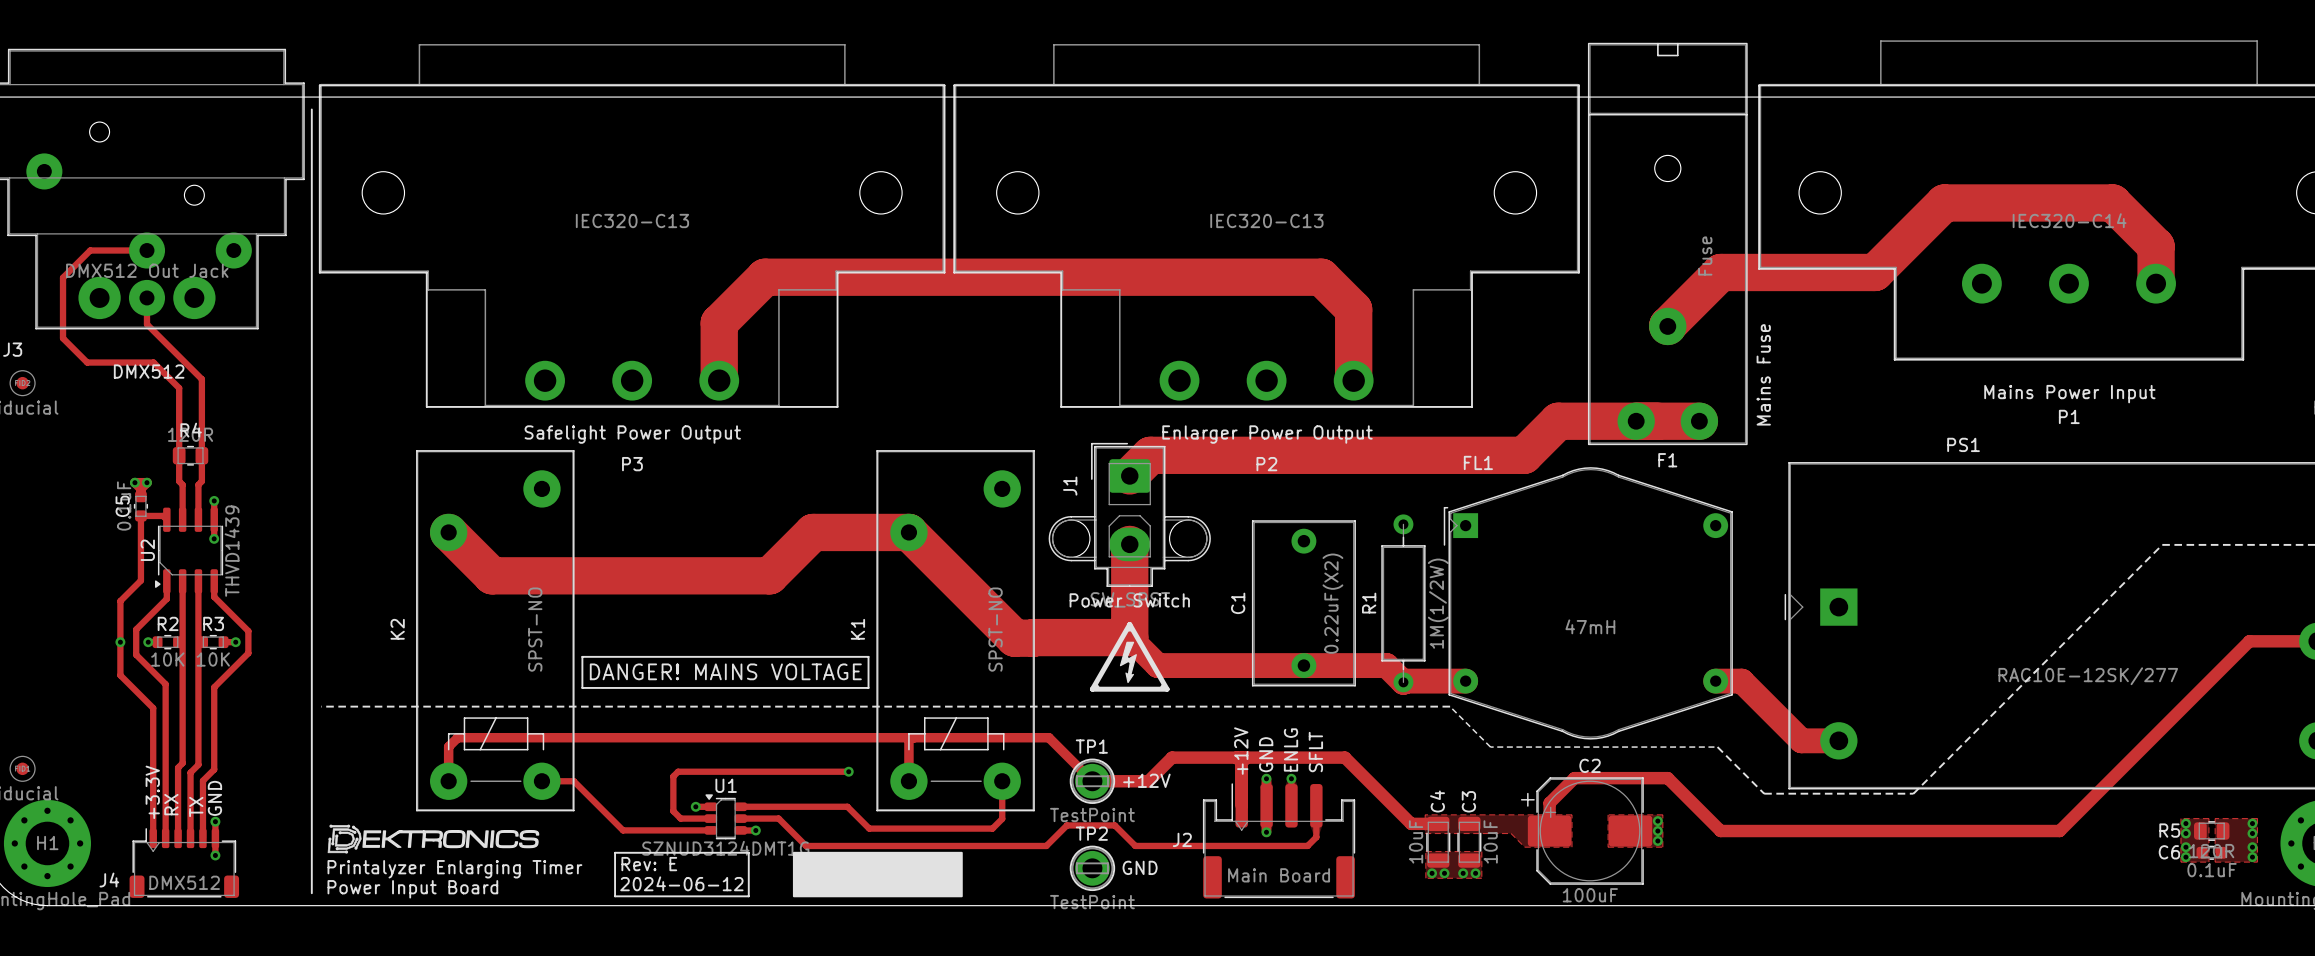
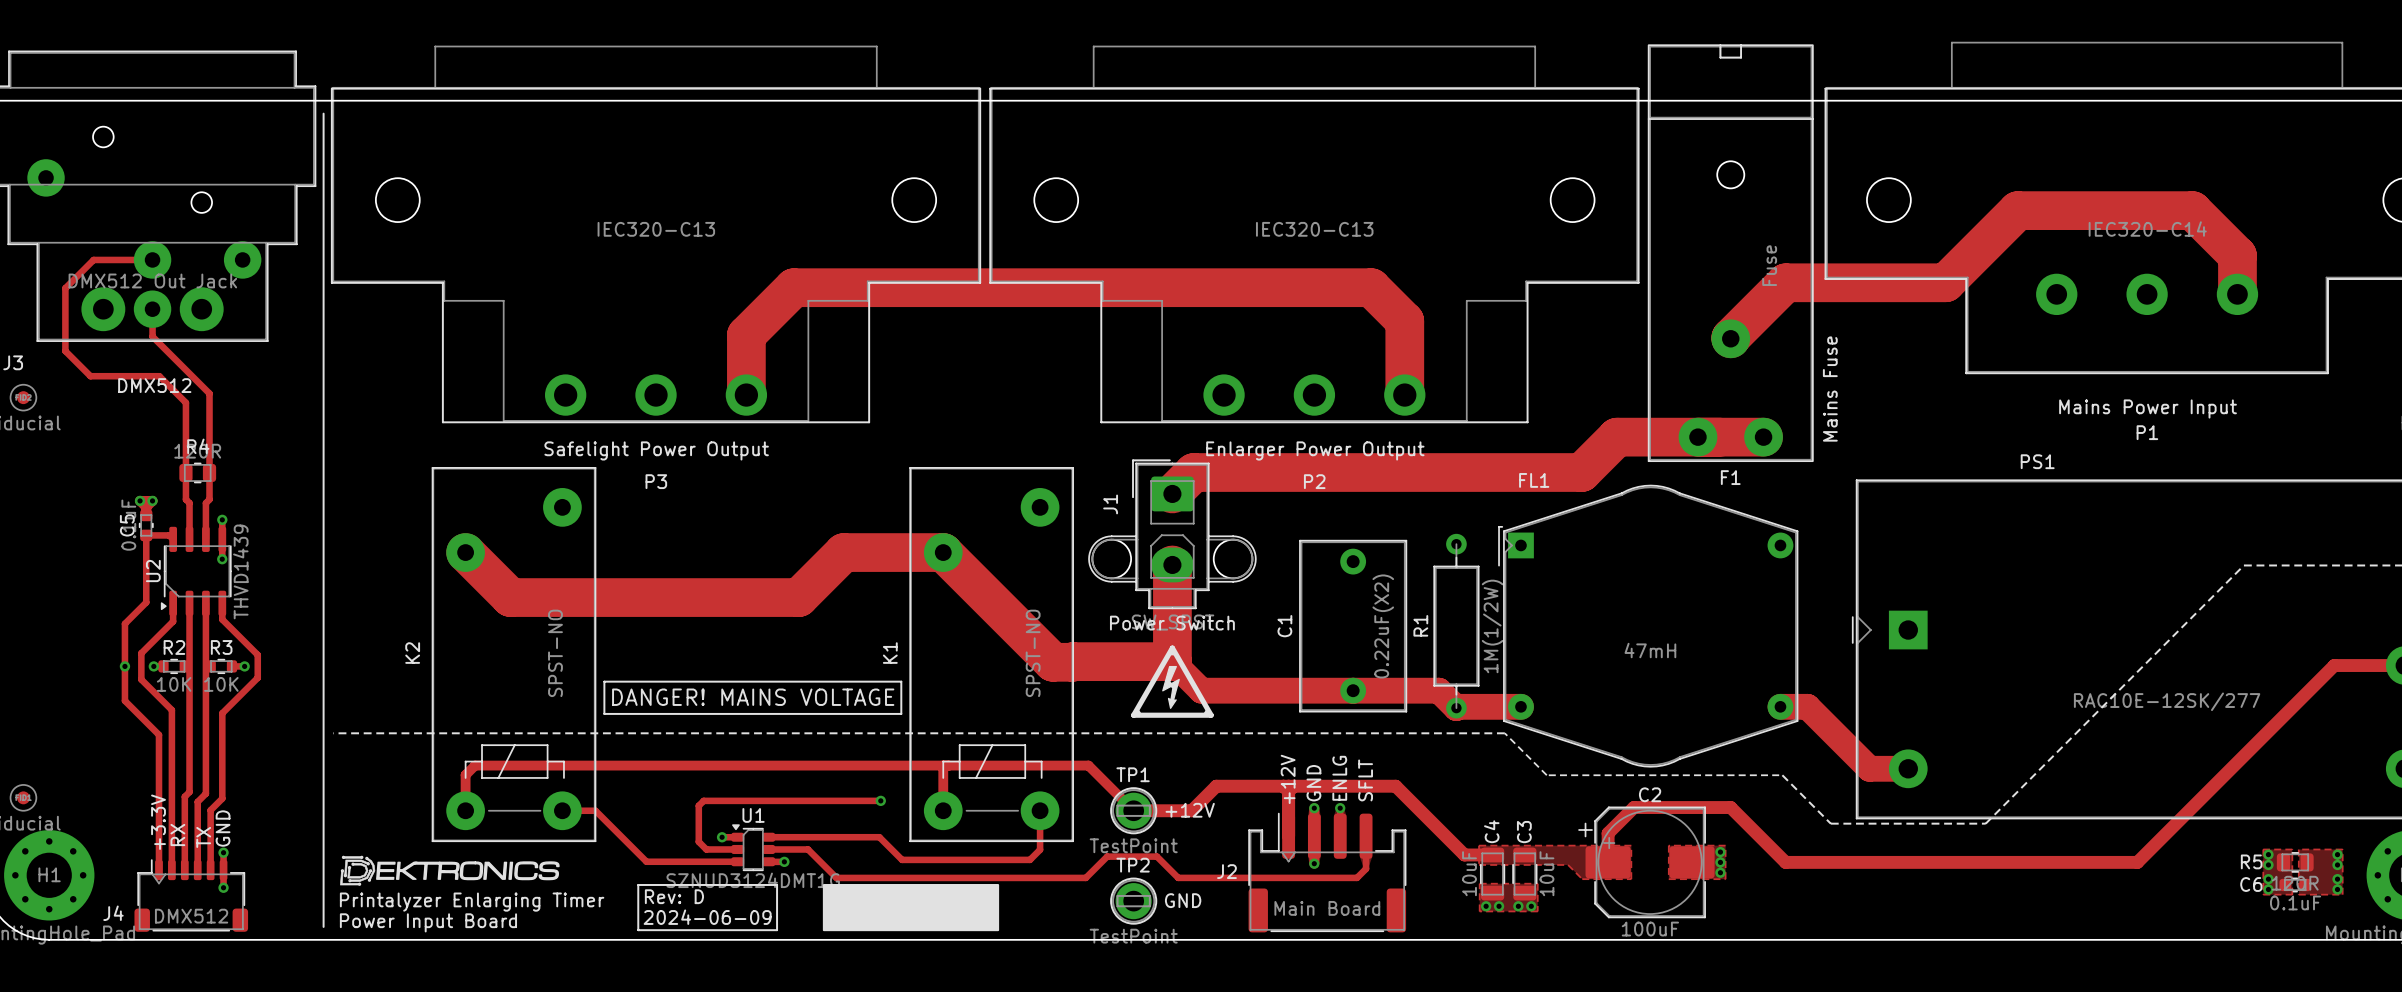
text: Rev: E (649, 864) -> Rev: D (674, 896)
text: 2024-06-12 (681, 883) -> 2024-06-09 (707, 917)

